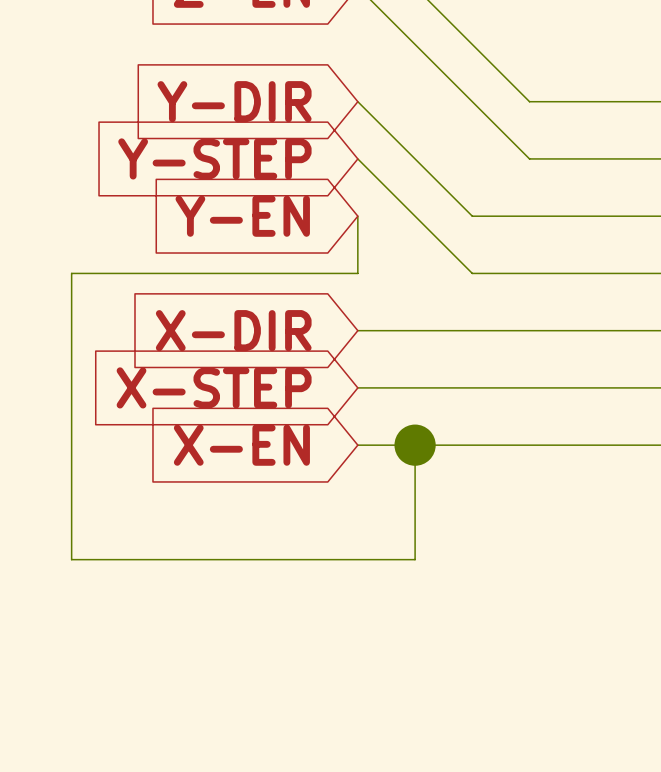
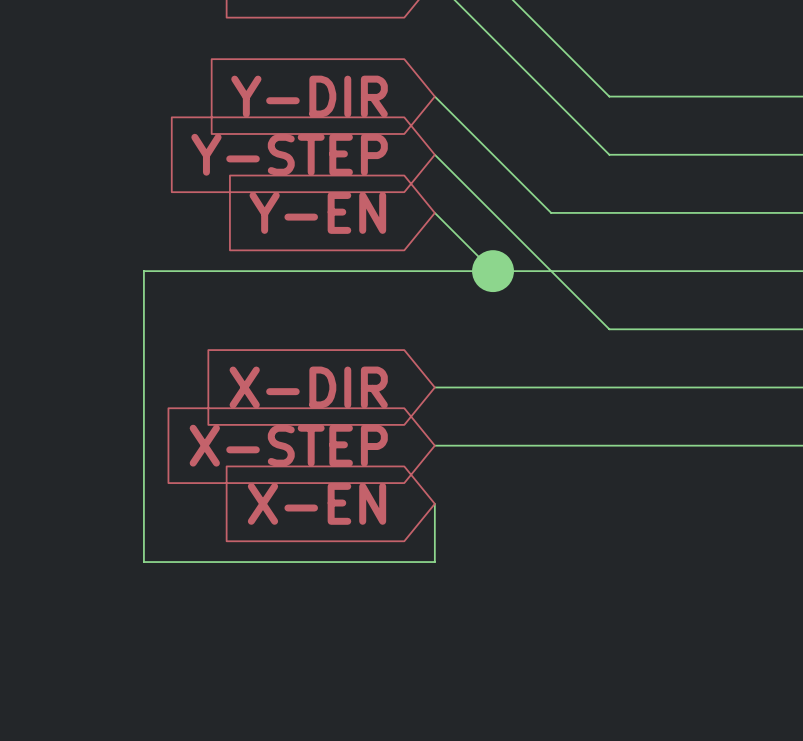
wire: (357, 216) (357, 273) -> (434, 212) (493, 271)
global label: X-DIR (233, 330) -> none
wire: (357, 330) (529, 330) -> (434, 271) (551, 271) (609, 329)
global label: X-STEP (214, 387) -> X-DIR (308, 387)
global label: X-EN (241, 445) -> X-STEP (288, 445)
wire: (415, 445) (415, 559) (357, 559) -> (434, 503) (434, 562)
junction position: (415, 445) -> (493, 271)
global label: none -> X-EN (317, 503)

